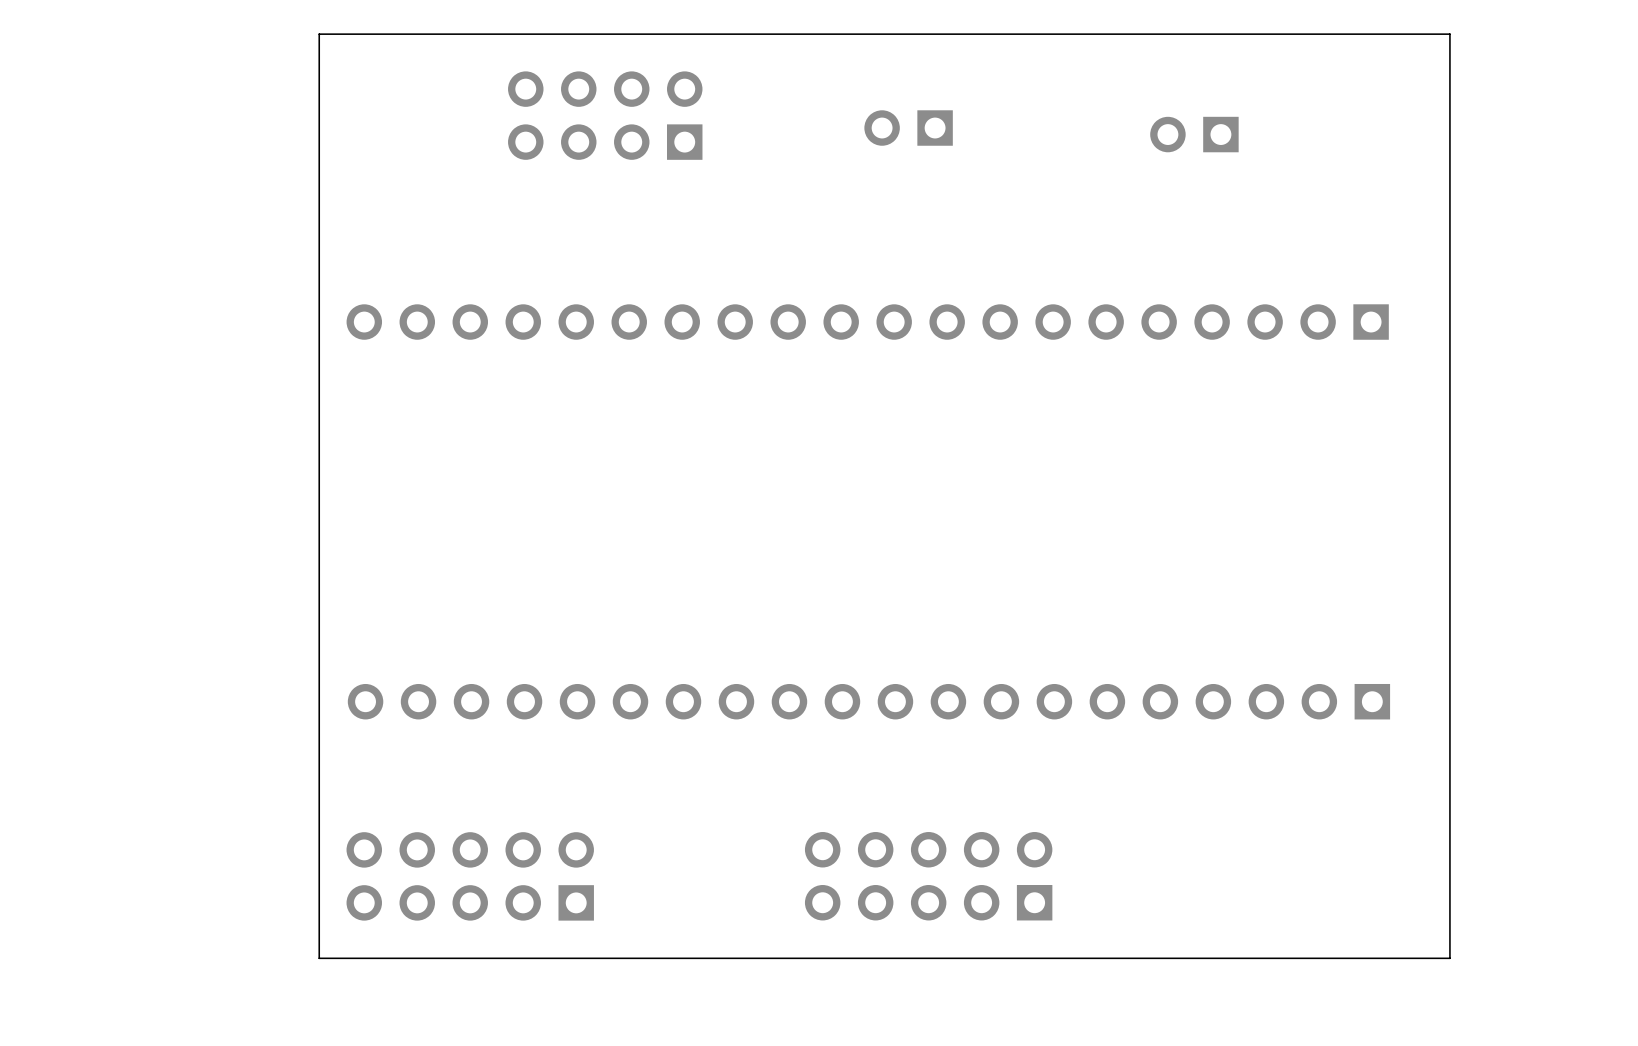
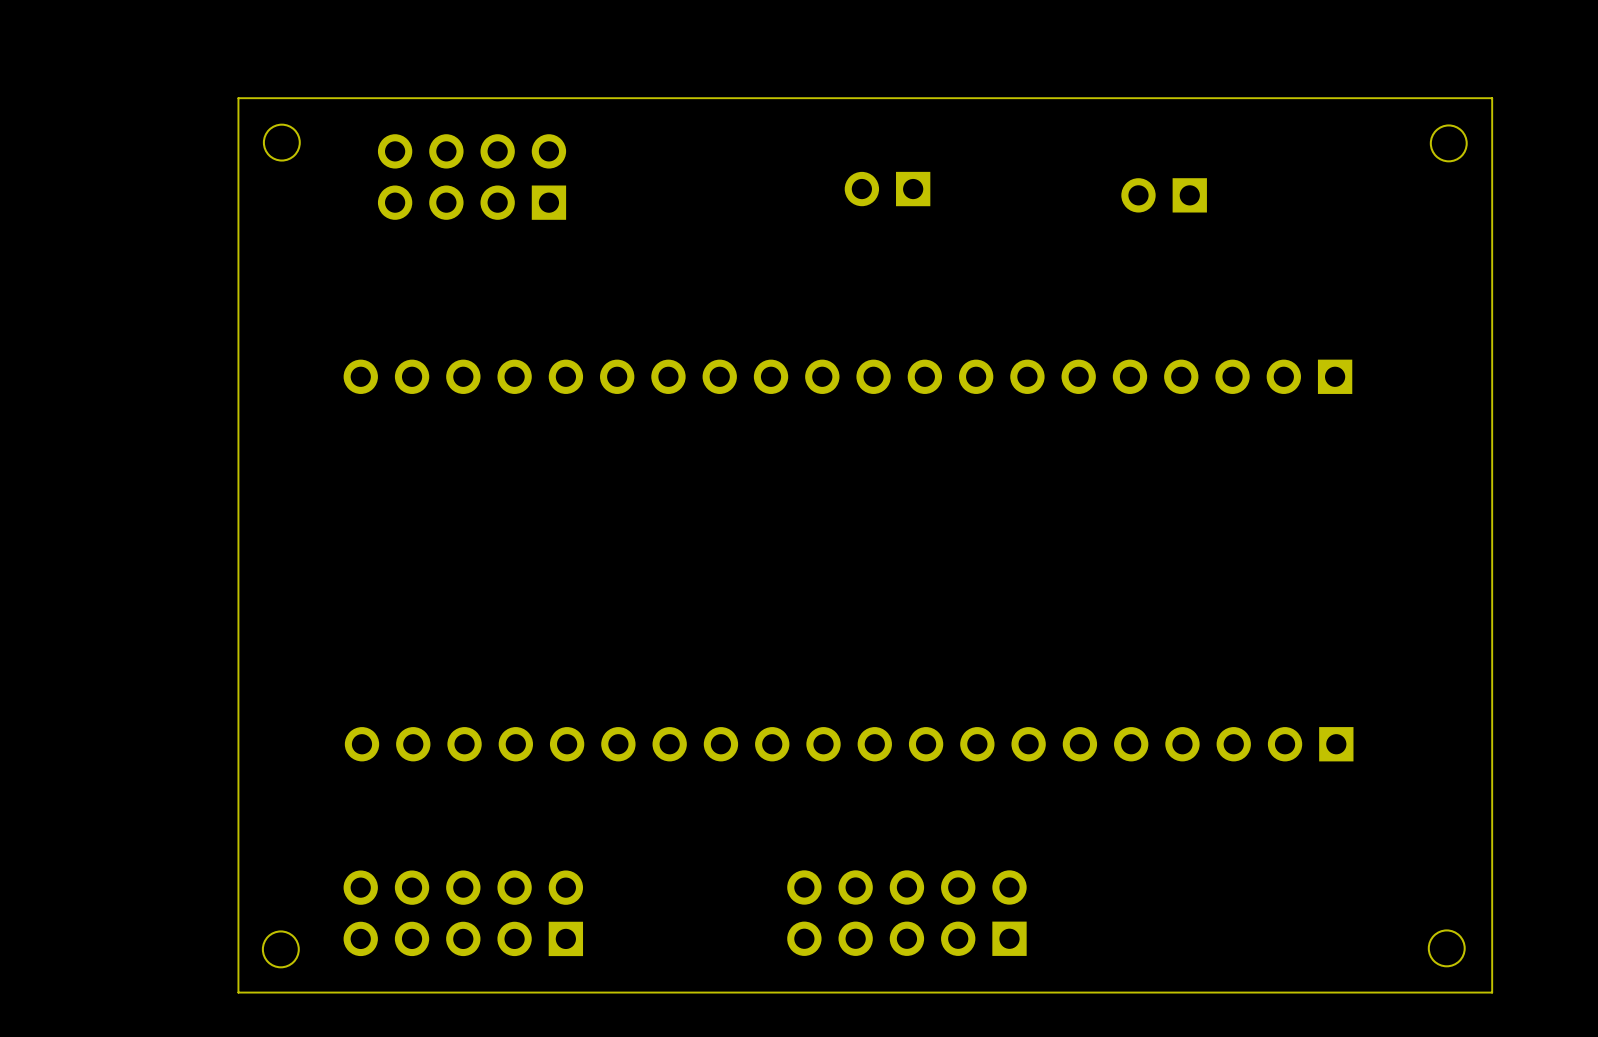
board edge: (319, 34) (319, 958) -> (317, 98) (238, 98) (238, 992) (317, 992)
board edge: (1449, 34) (1449, 958) -> (1411, 98) (1492, 98) (1492, 992) (1411, 992)
round board edge: none -> [262, 123, 301, 162]
round board edge: none -> [1429, 124, 1468, 163]
part position: (605, 115) -> (472, 177)
round board edge: none -> [1427, 929, 1466, 968]
round board edge: none -> [261, 930, 300, 969]

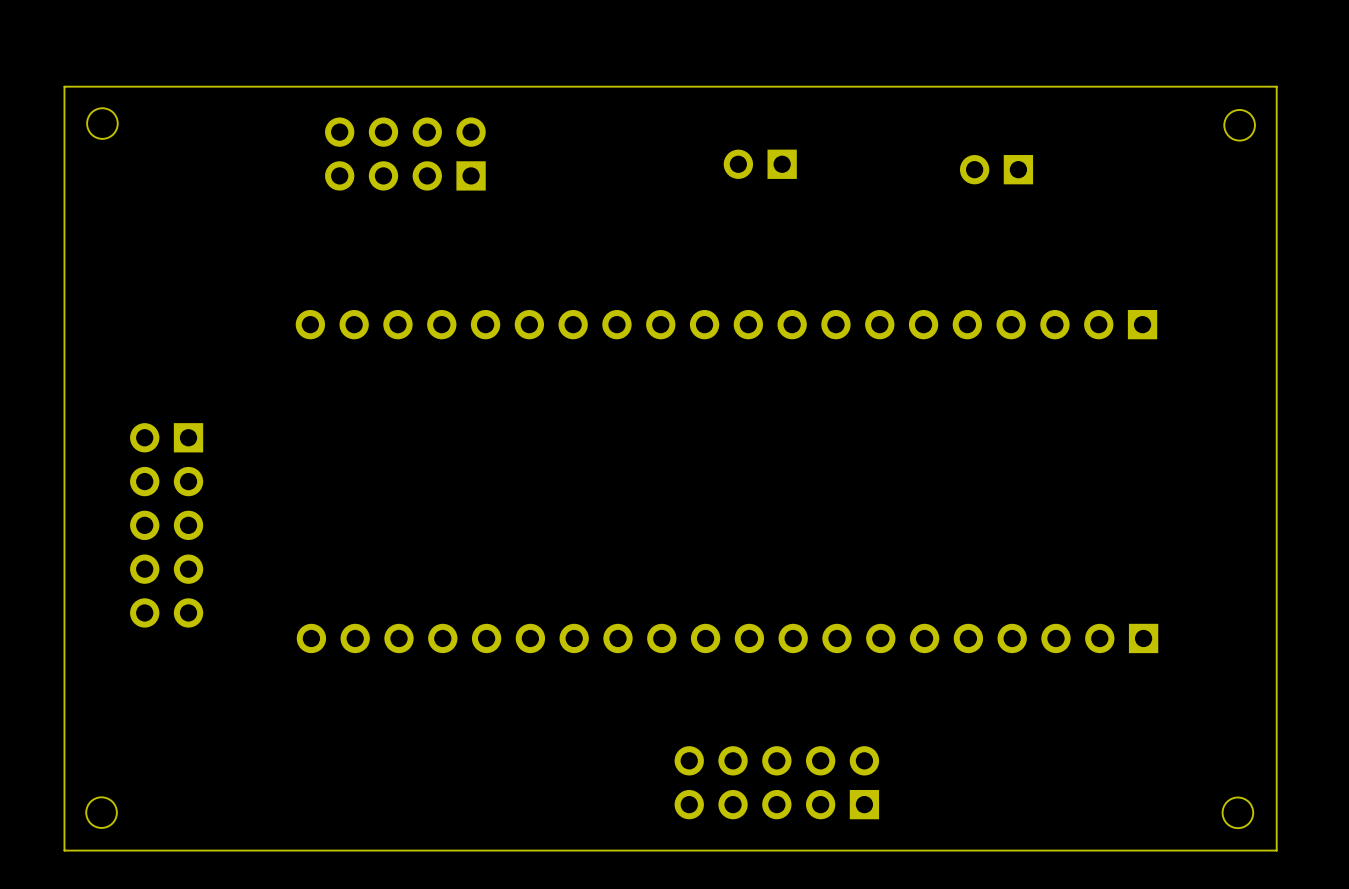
board edge: (238, 98) (238, 992) -> (205, 86) (64, 86) (64, 850) (205, 850)
round board edge position: (281, 142) -> (102, 123)
part rotation: 0° (463, 913) -> 90° counterclockwise (166, 525)
part position: (463, 913) -> (166, 525)
round board edge position: (280, 949) -> (101, 812)

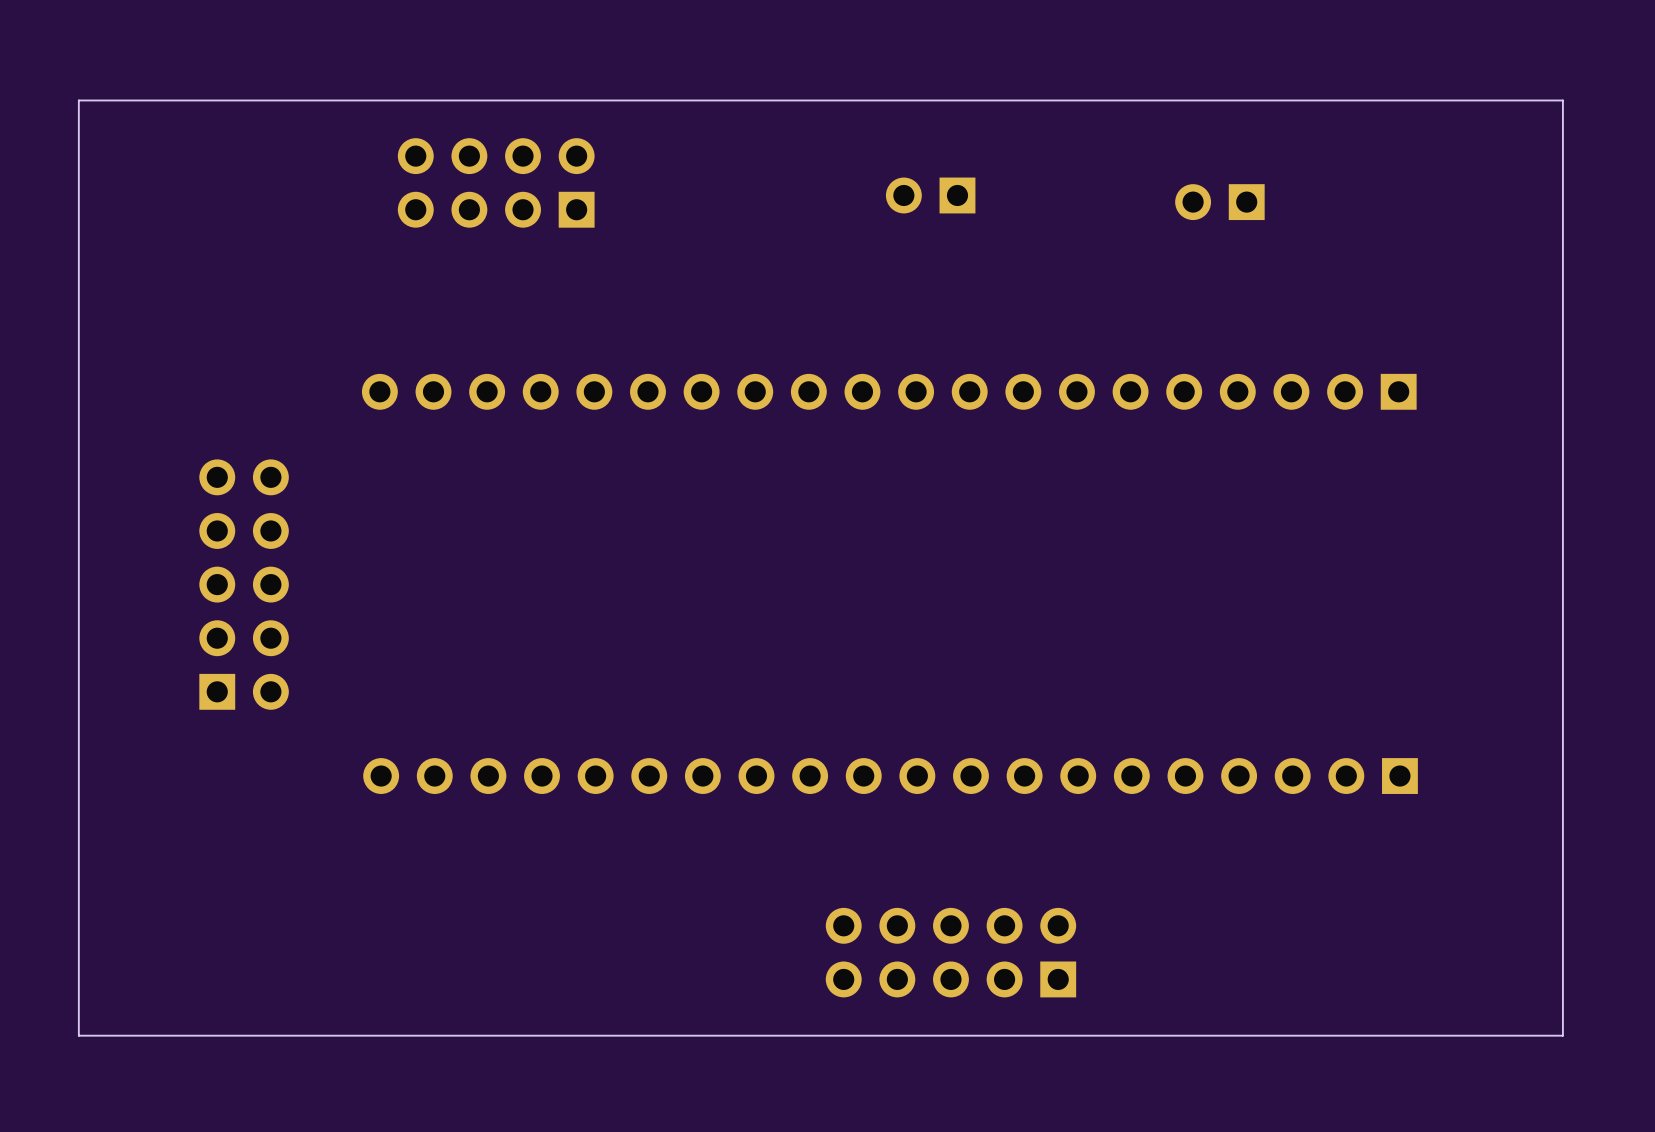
round board edge: [86, 107, 119, 140] -> none
round board edge: [1223, 109, 1256, 142] -> none
part rotation: 0° (166, 525) -> 180° (244, 584)
round board edge: [85, 796, 118, 829] -> none
round board edge: [1221, 796, 1255, 830] -> none

